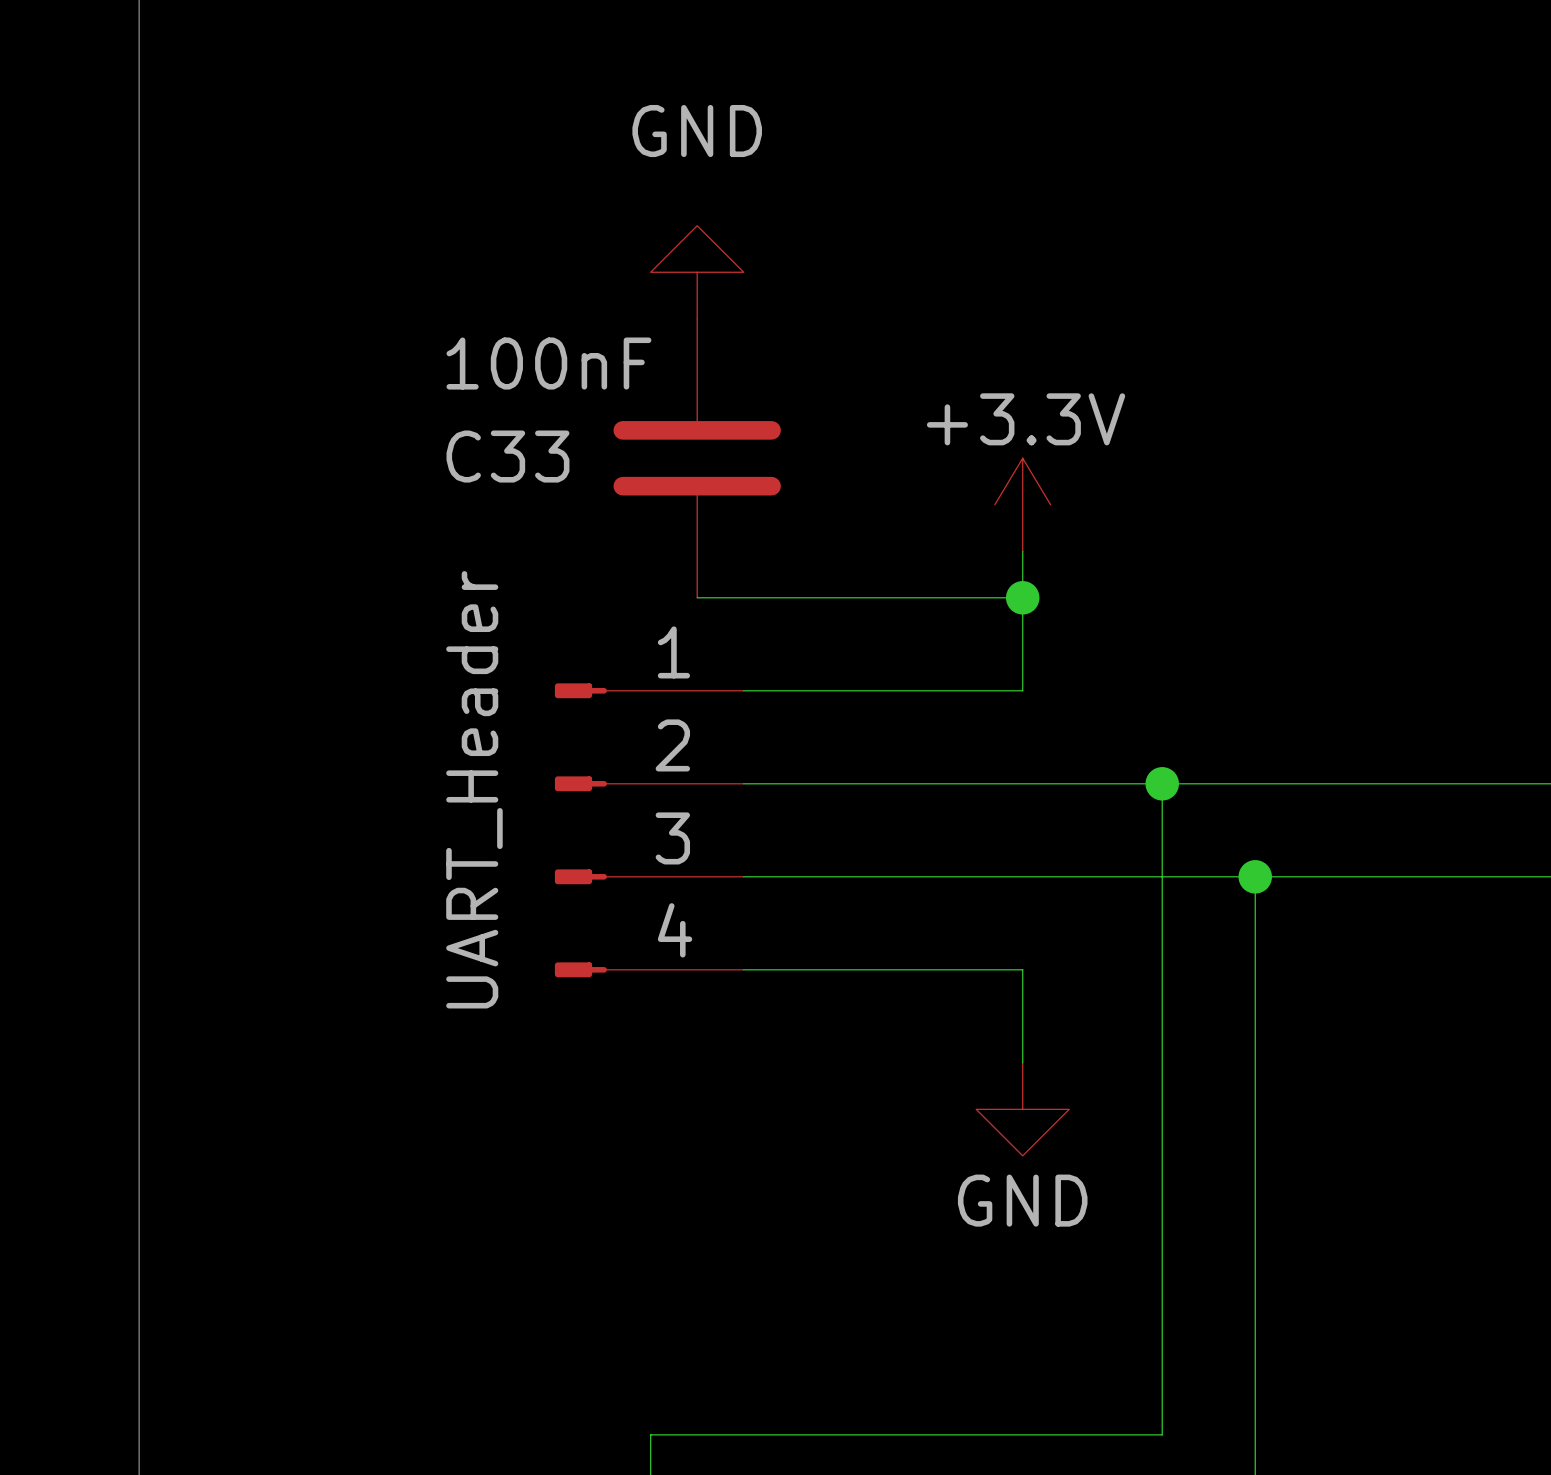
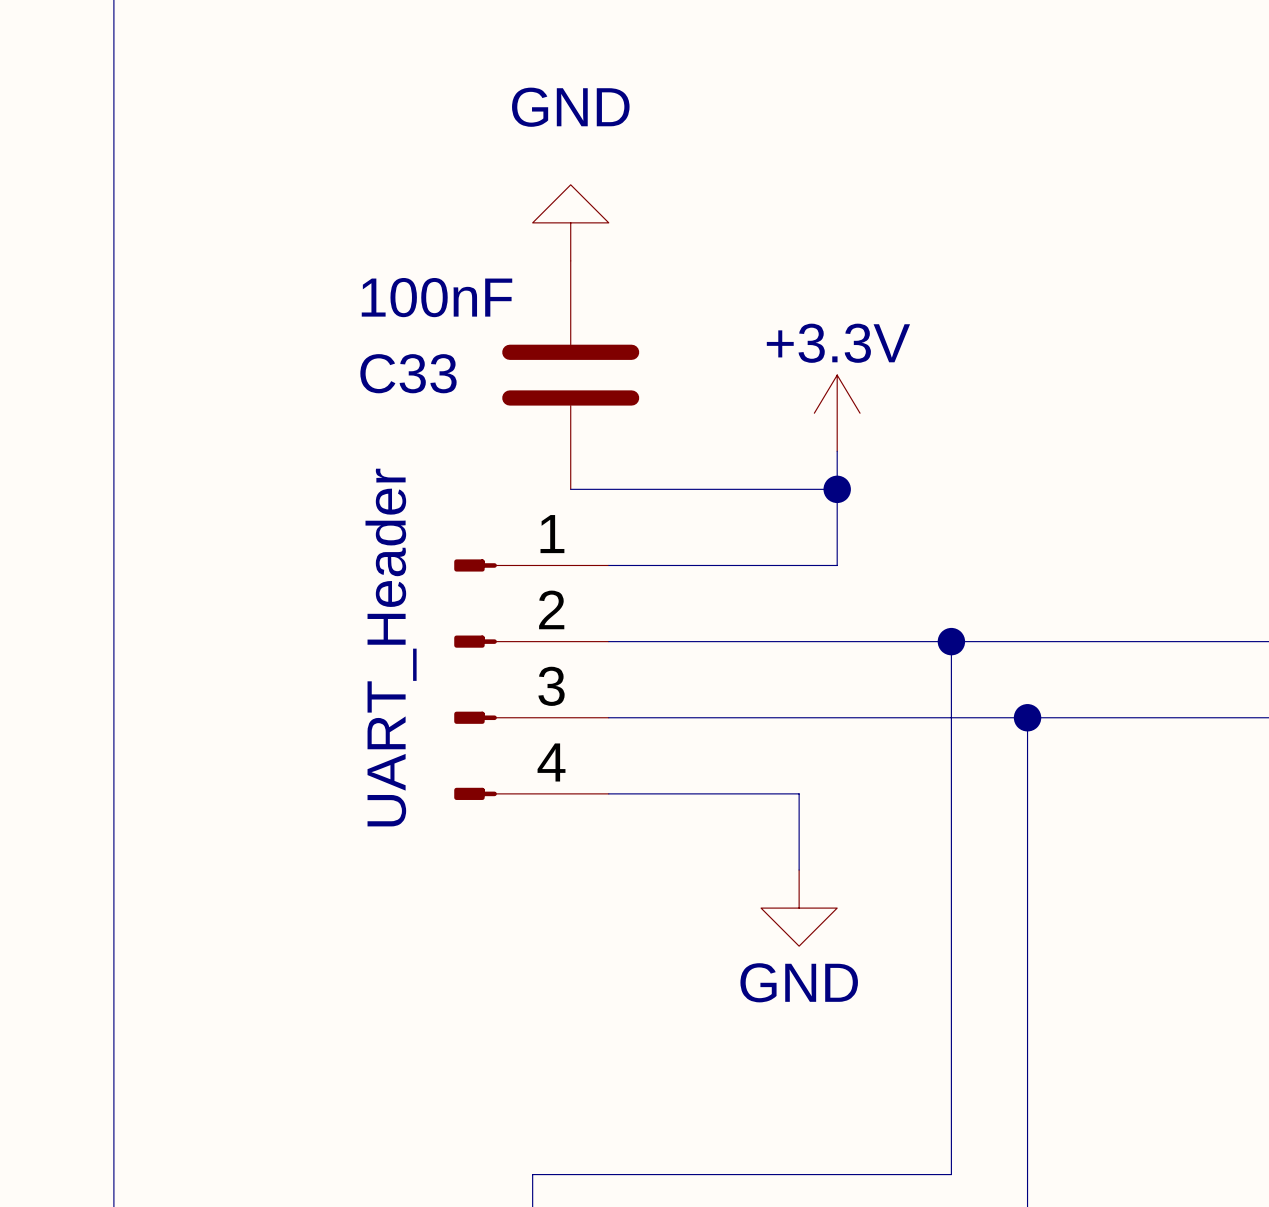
wire: (976, 969) (1022, 969) (1022, 1062) -> (799, 793) (799, 870)
power symbol position: GND (1022, 1109) -> GND (799, 908)

